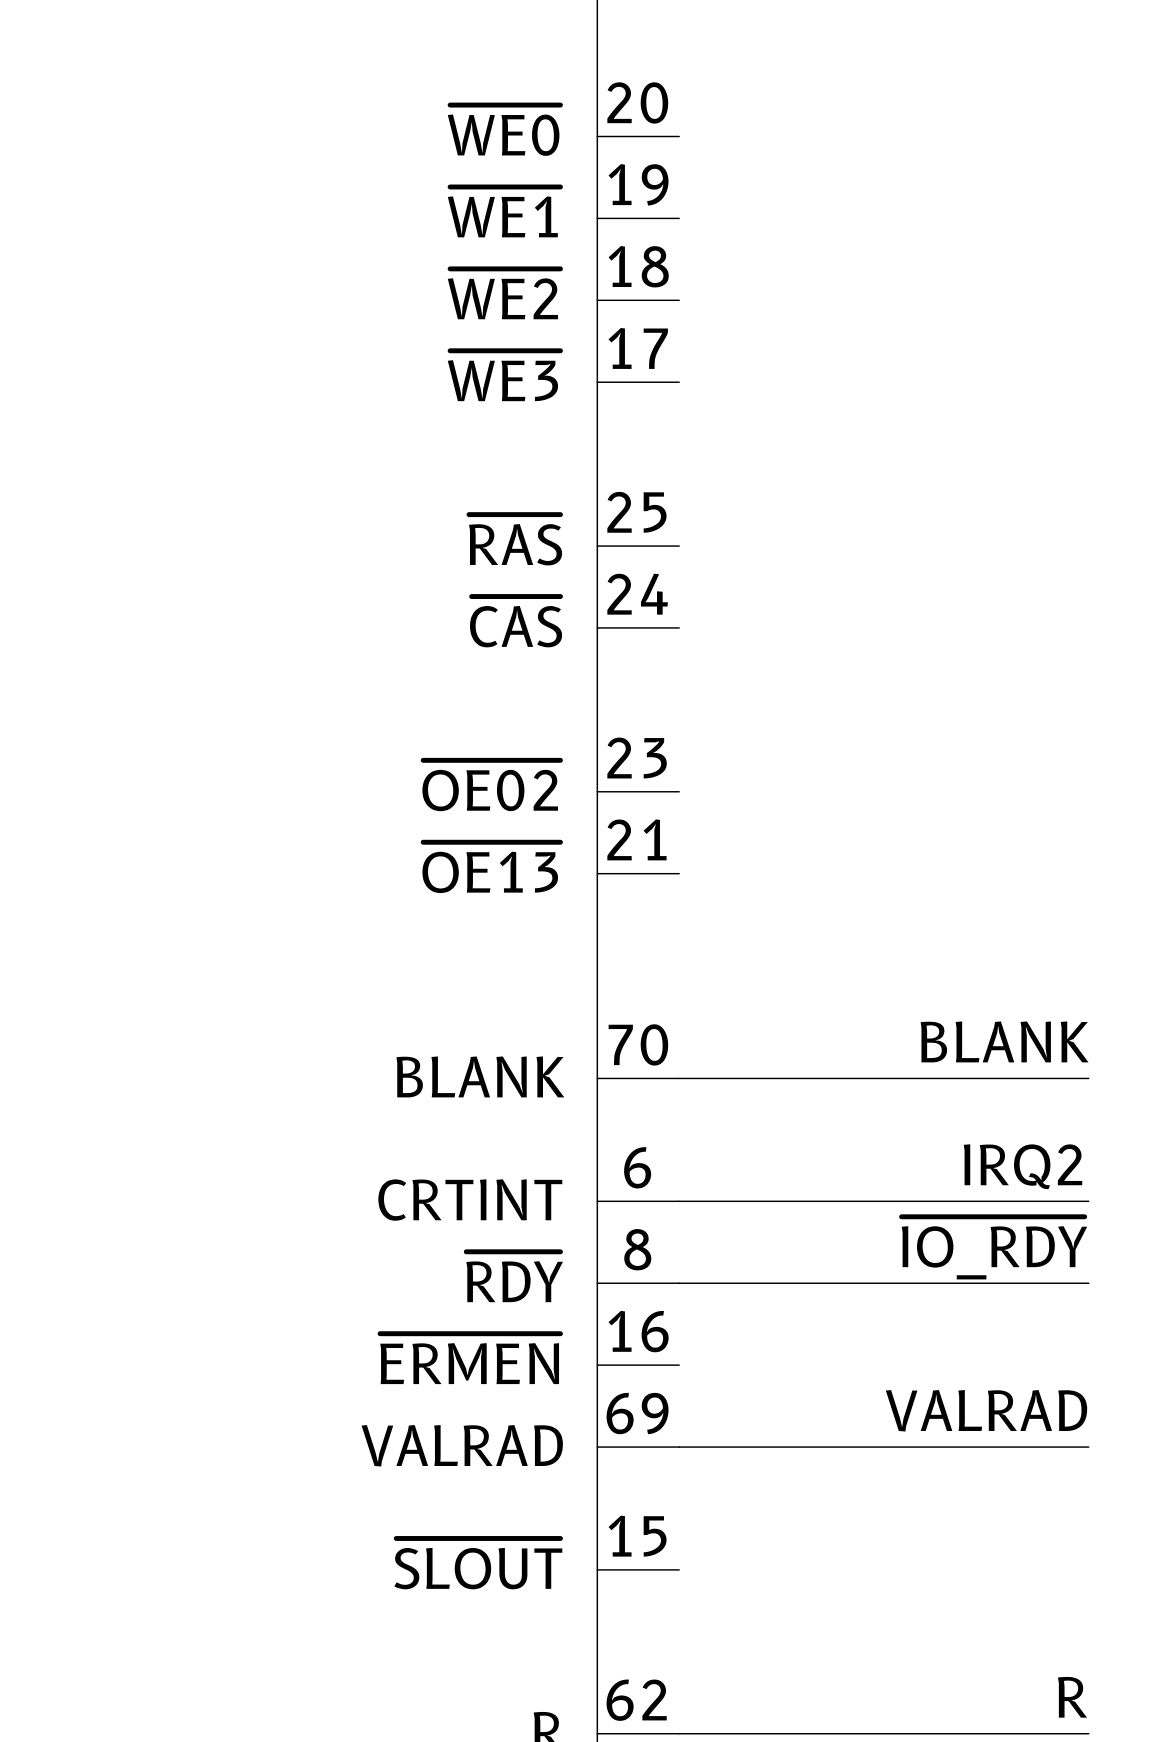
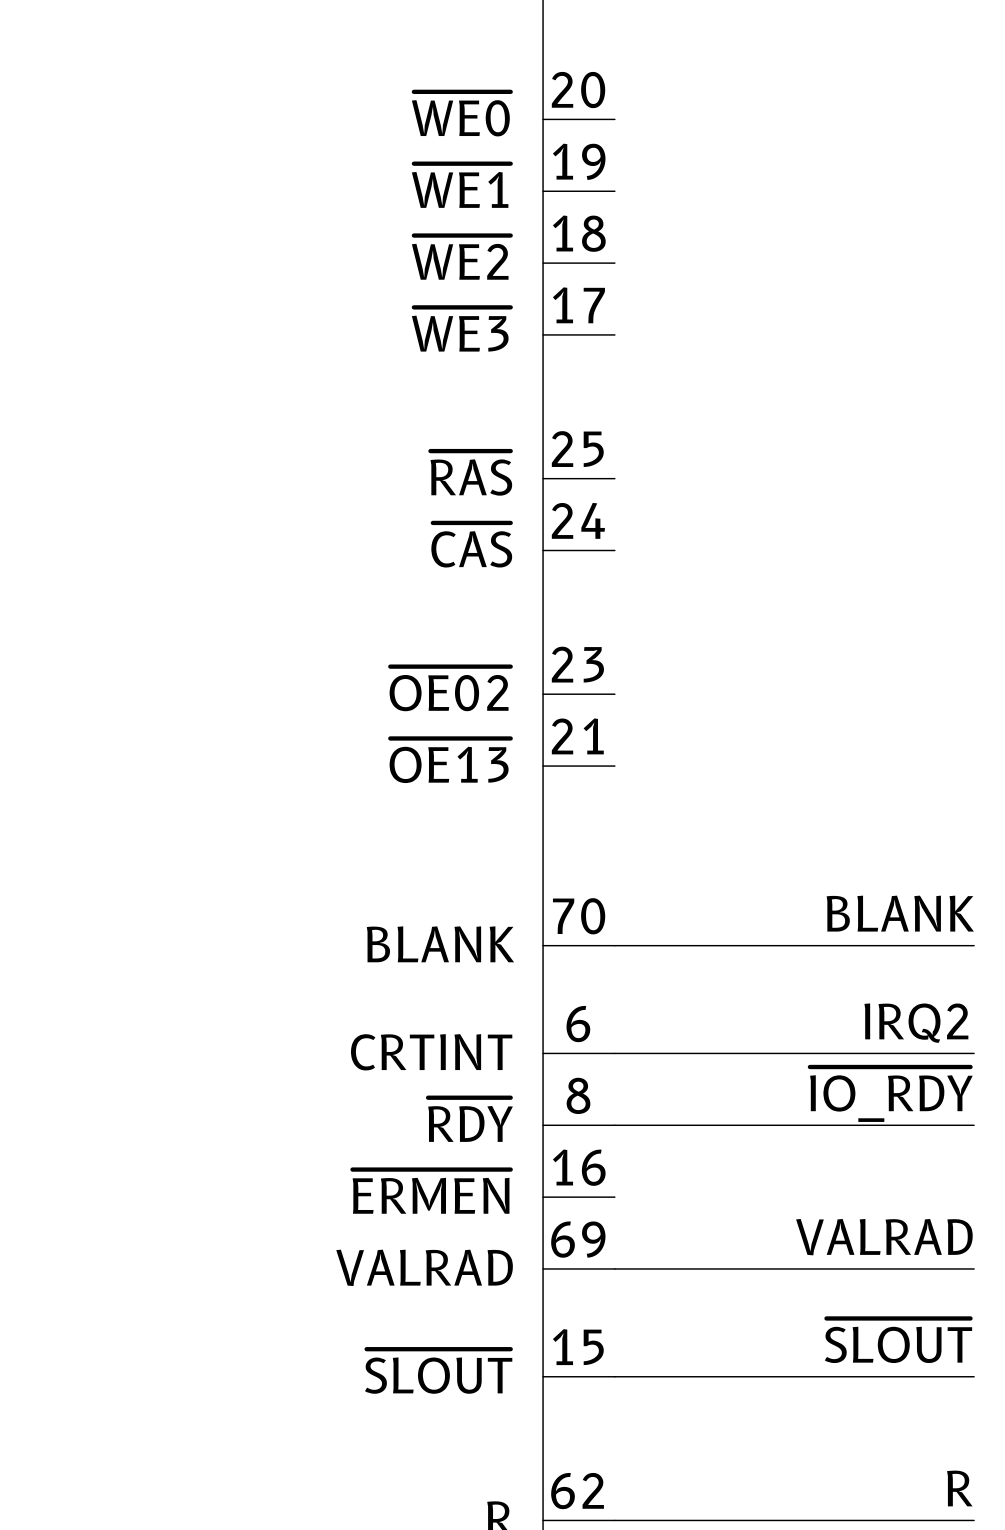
label: none -> ~{SLOUT} (898, 1340)
wire: none -> (614, 1376) (974, 1376)

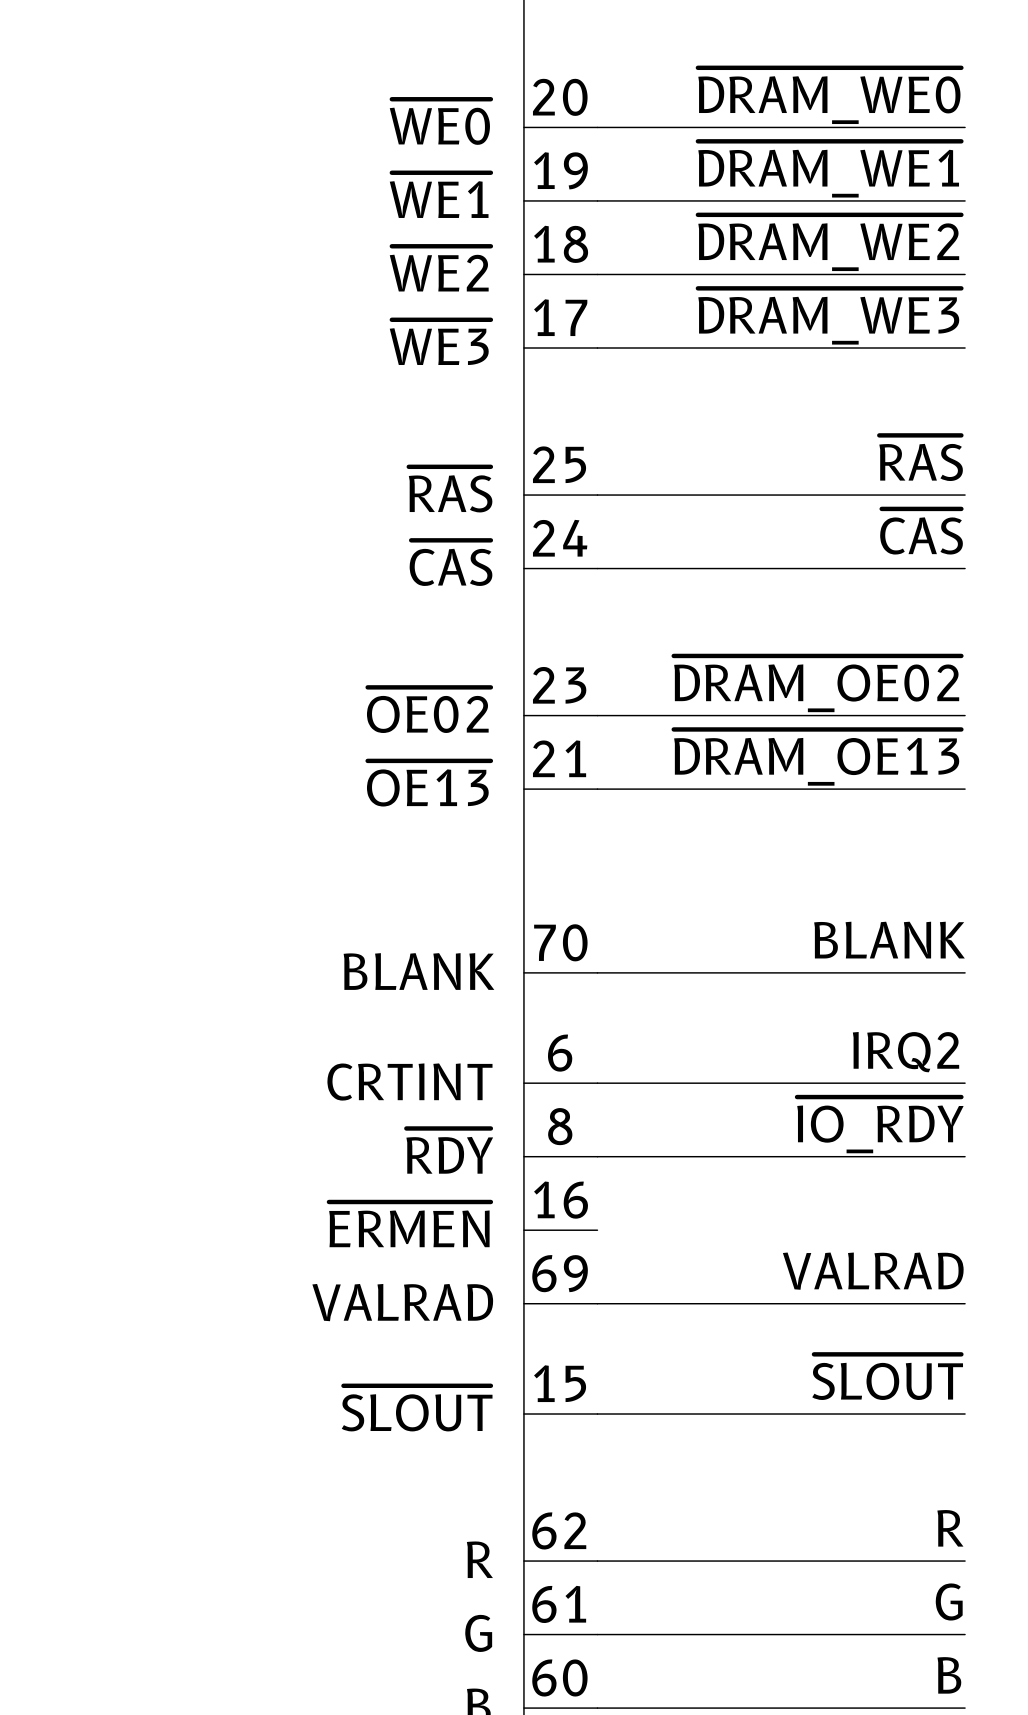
label: none -> ~{DRAM_WE0} (829, 95)
wire: none -> (597, 127) (965, 127)
label: none -> ~{DRAM_WE1} (829, 169)
wire: none -> (597, 200) (965, 200)
label: none -> ~{DRAM_WE2} (829, 242)
wire: none -> (597, 274) (965, 274)
label: none -> ~{DRAM_WE3} (829, 316)
wire: none -> (597, 348) (965, 348)
label: none -> ~{RAS} (921, 458)
wire: none -> (597, 495) (965, 495)
label: none -> ~{CAS} (921, 531)
wire: none -> (597, 568) (965, 568)
label: none -> ~{DRAM_OE02} (817, 684)
wire: none -> (597, 715) (965, 715)
label: none -> ~{DRAM_OE13} (817, 757)
wire: none -> (597, 789) (965, 789)

